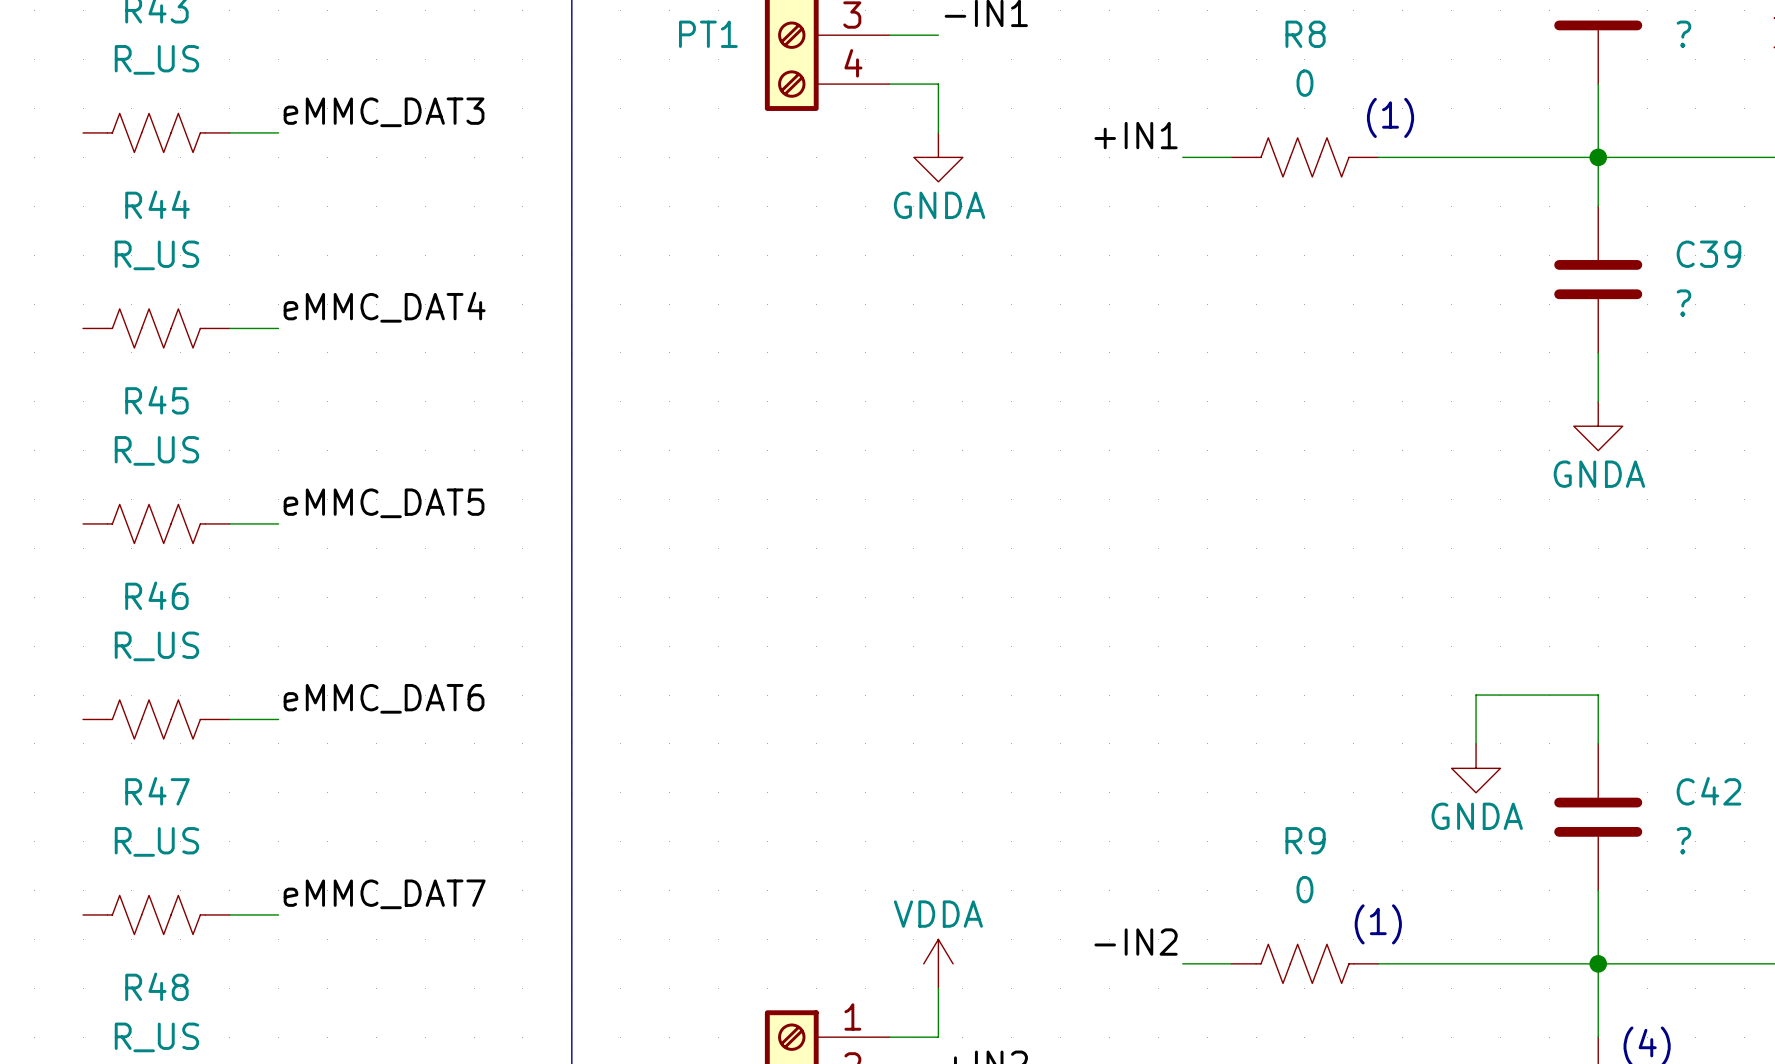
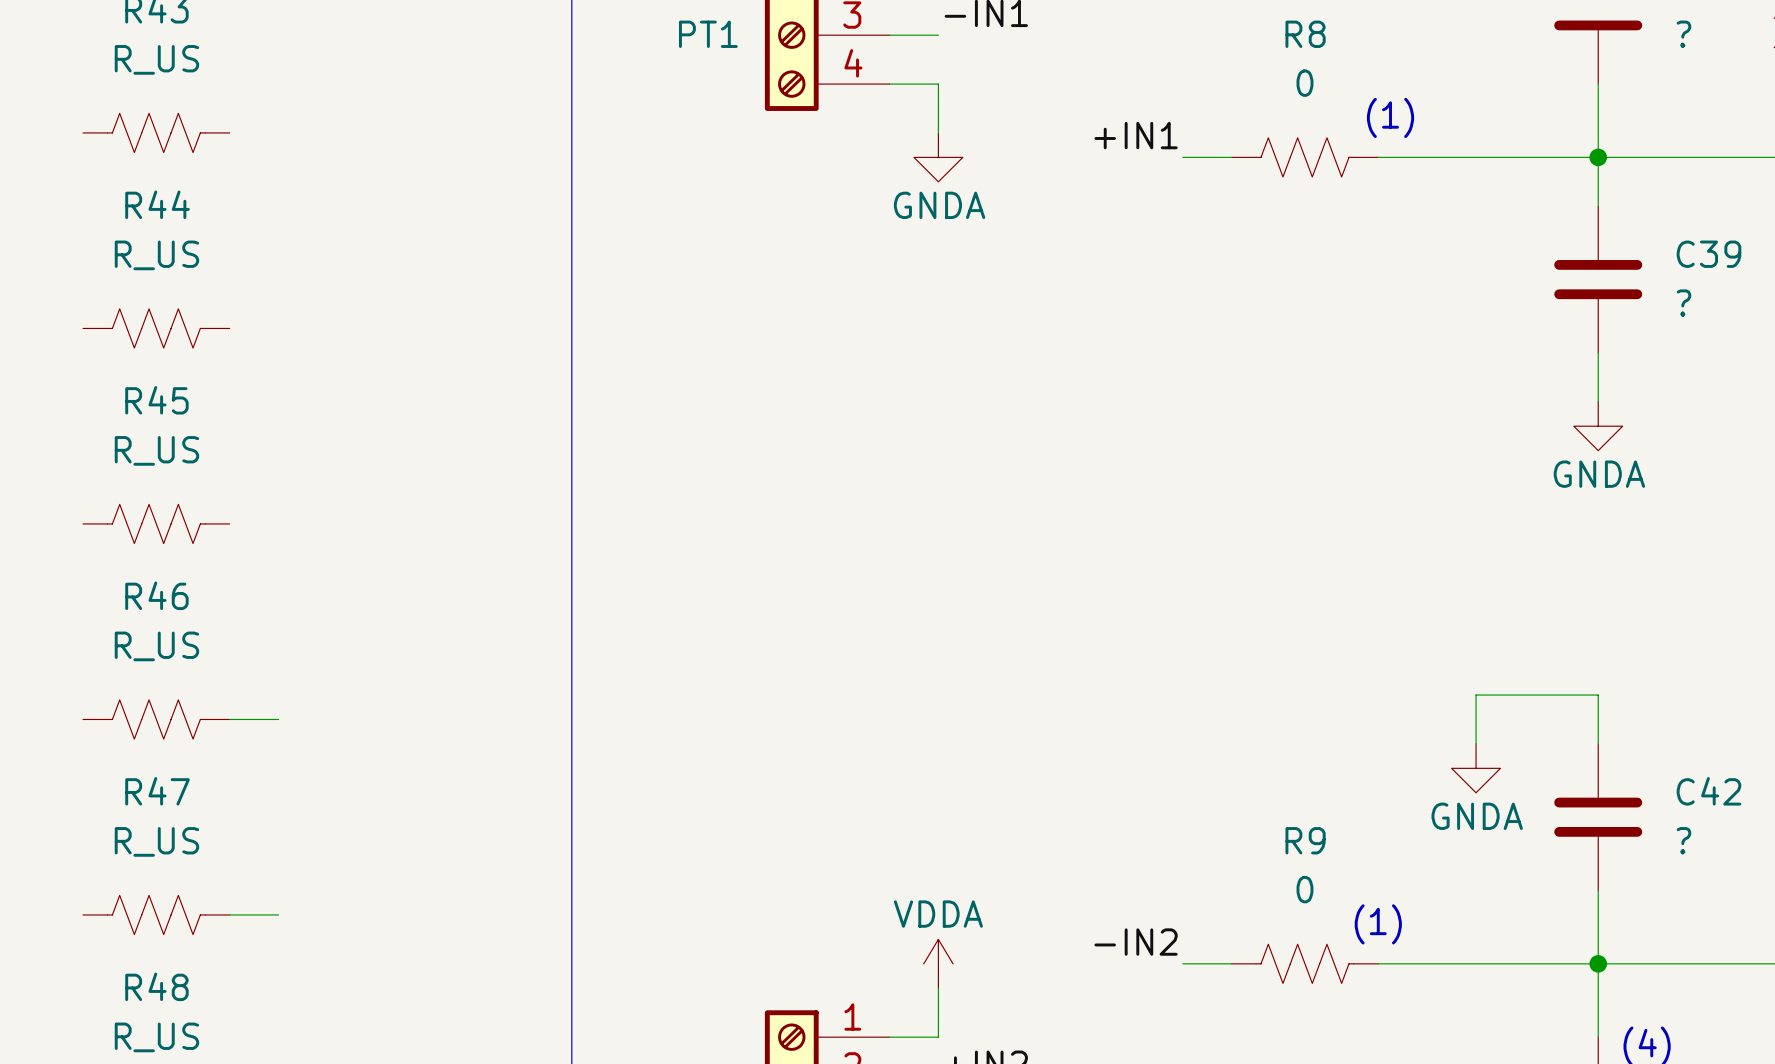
label: eMMC_DAT3 (384, 112) -> none
wire: (229, 132) (278, 132) -> none
label: eMMC_DAT4 (384, 307) -> none
wire: (229, 328) (278, 328) -> none
label: eMMC_DAT5 (384, 503) -> none
wire: (229, 523) (278, 523) -> none
label: eMMC_DAT6 (384, 698) -> none
label: eMMC_DAT7 (384, 894) -> none

